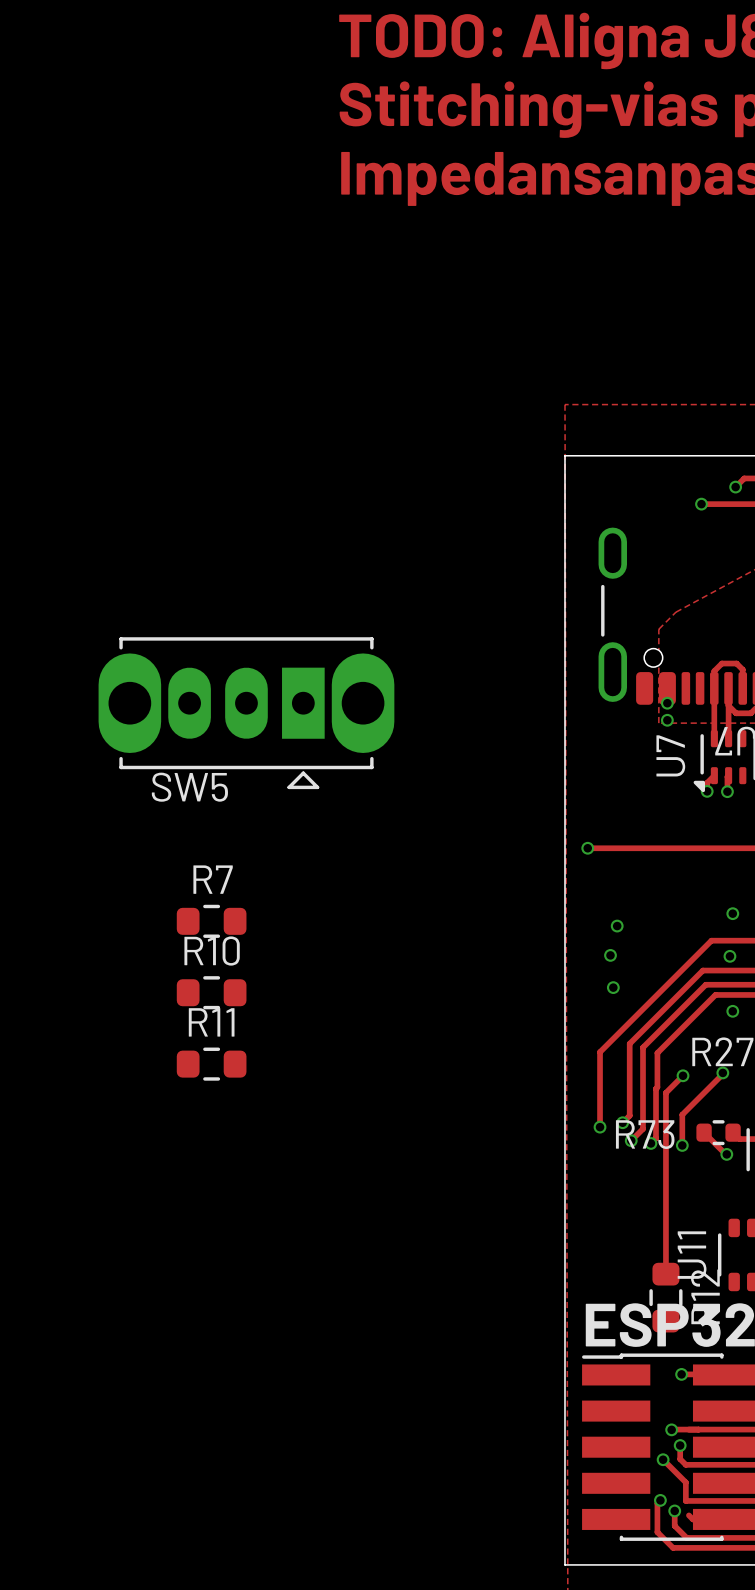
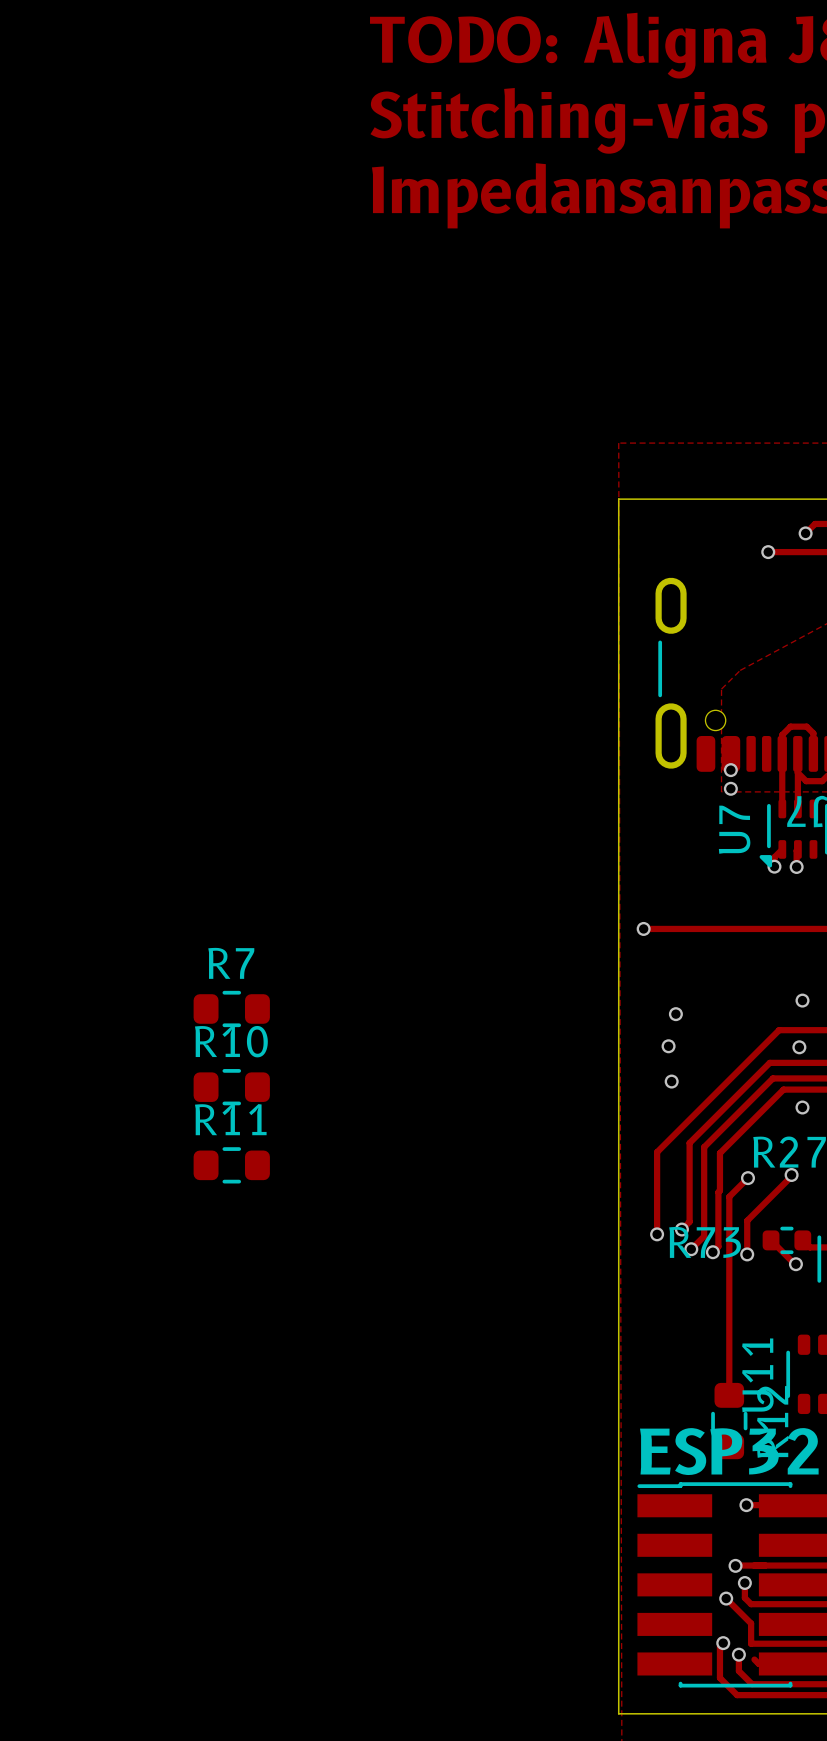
SW5: (246, 713) -> none

